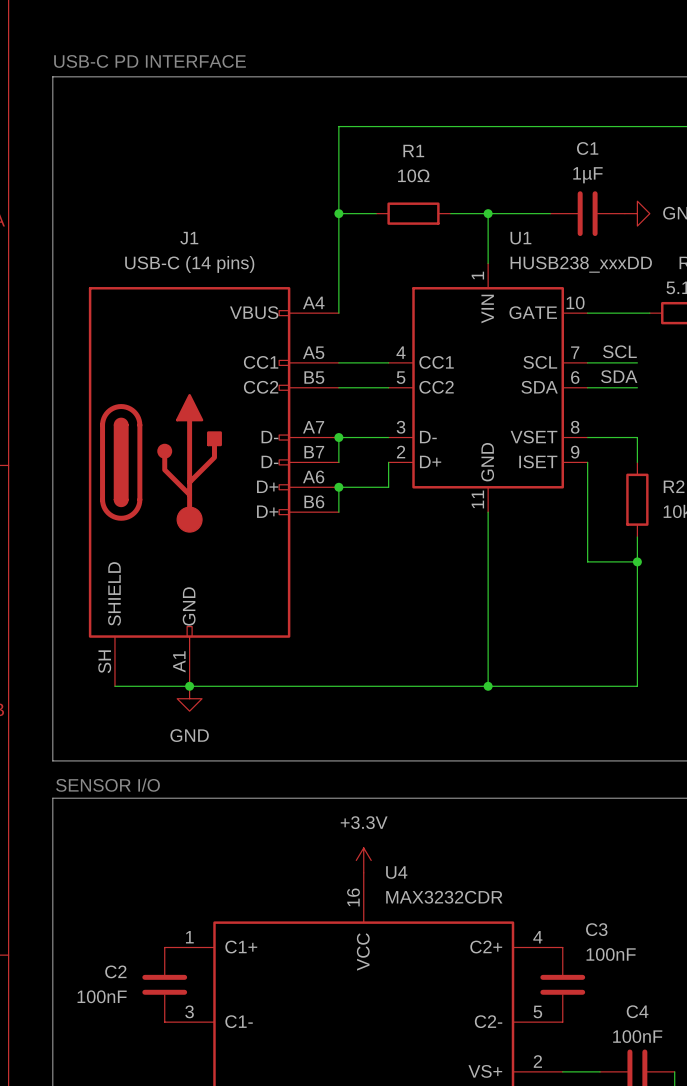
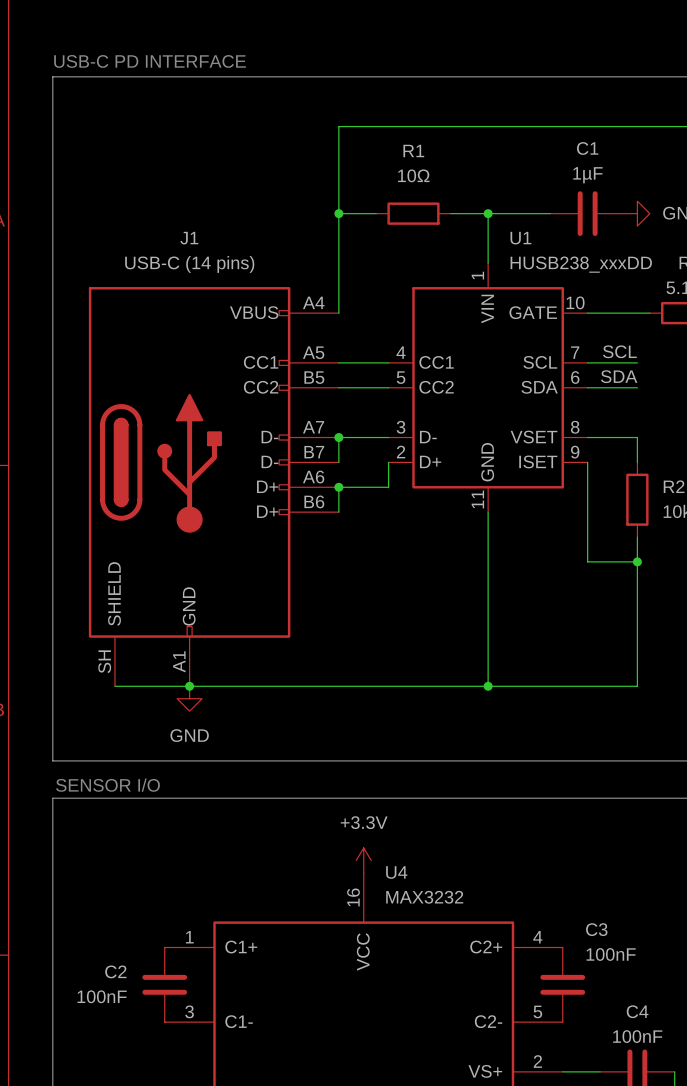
U4 value: MAX3232CDR (444, 897) -> MAX3232 (424, 897)

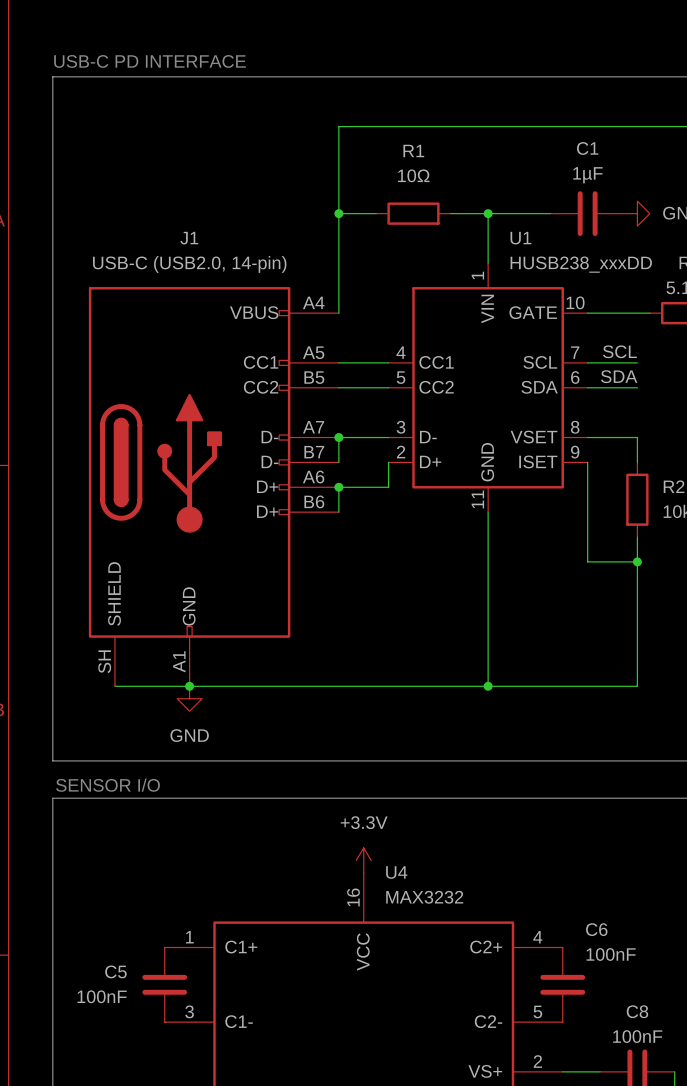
J1 value: USB-C (14 pins) (189, 264) -> USB-C (USB2.0, 14-pin) (189, 264)
C3 name: C3 (596, 929) -> C6 (596, 929)
C2 name: C2 (115, 971) -> C5 (115, 971)
C4 name: C4 (637, 1011) -> C8 (637, 1011)

